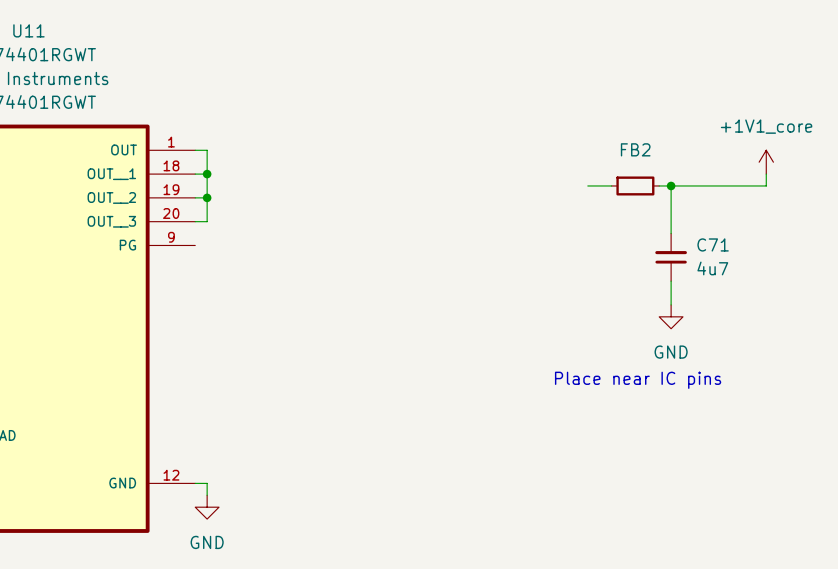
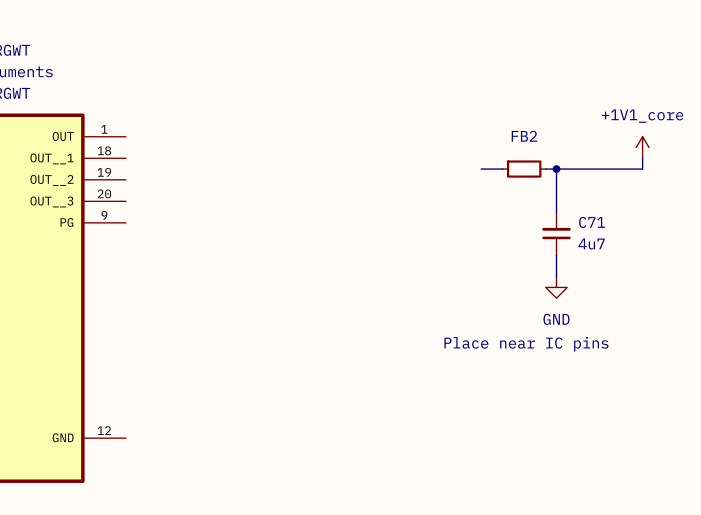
wire: (195, 150) (207, 150) (207, 221) (195, 221) -> none
wire: (195, 174) (207, 174) -> none
junction: (207, 174) -> none
wire: (195, 197) (207, 197) -> none
junction: (207, 197) -> none
wire: (195, 483) (207, 483) (207, 495) -> none
power symbol: GND (207, 507) -> none

